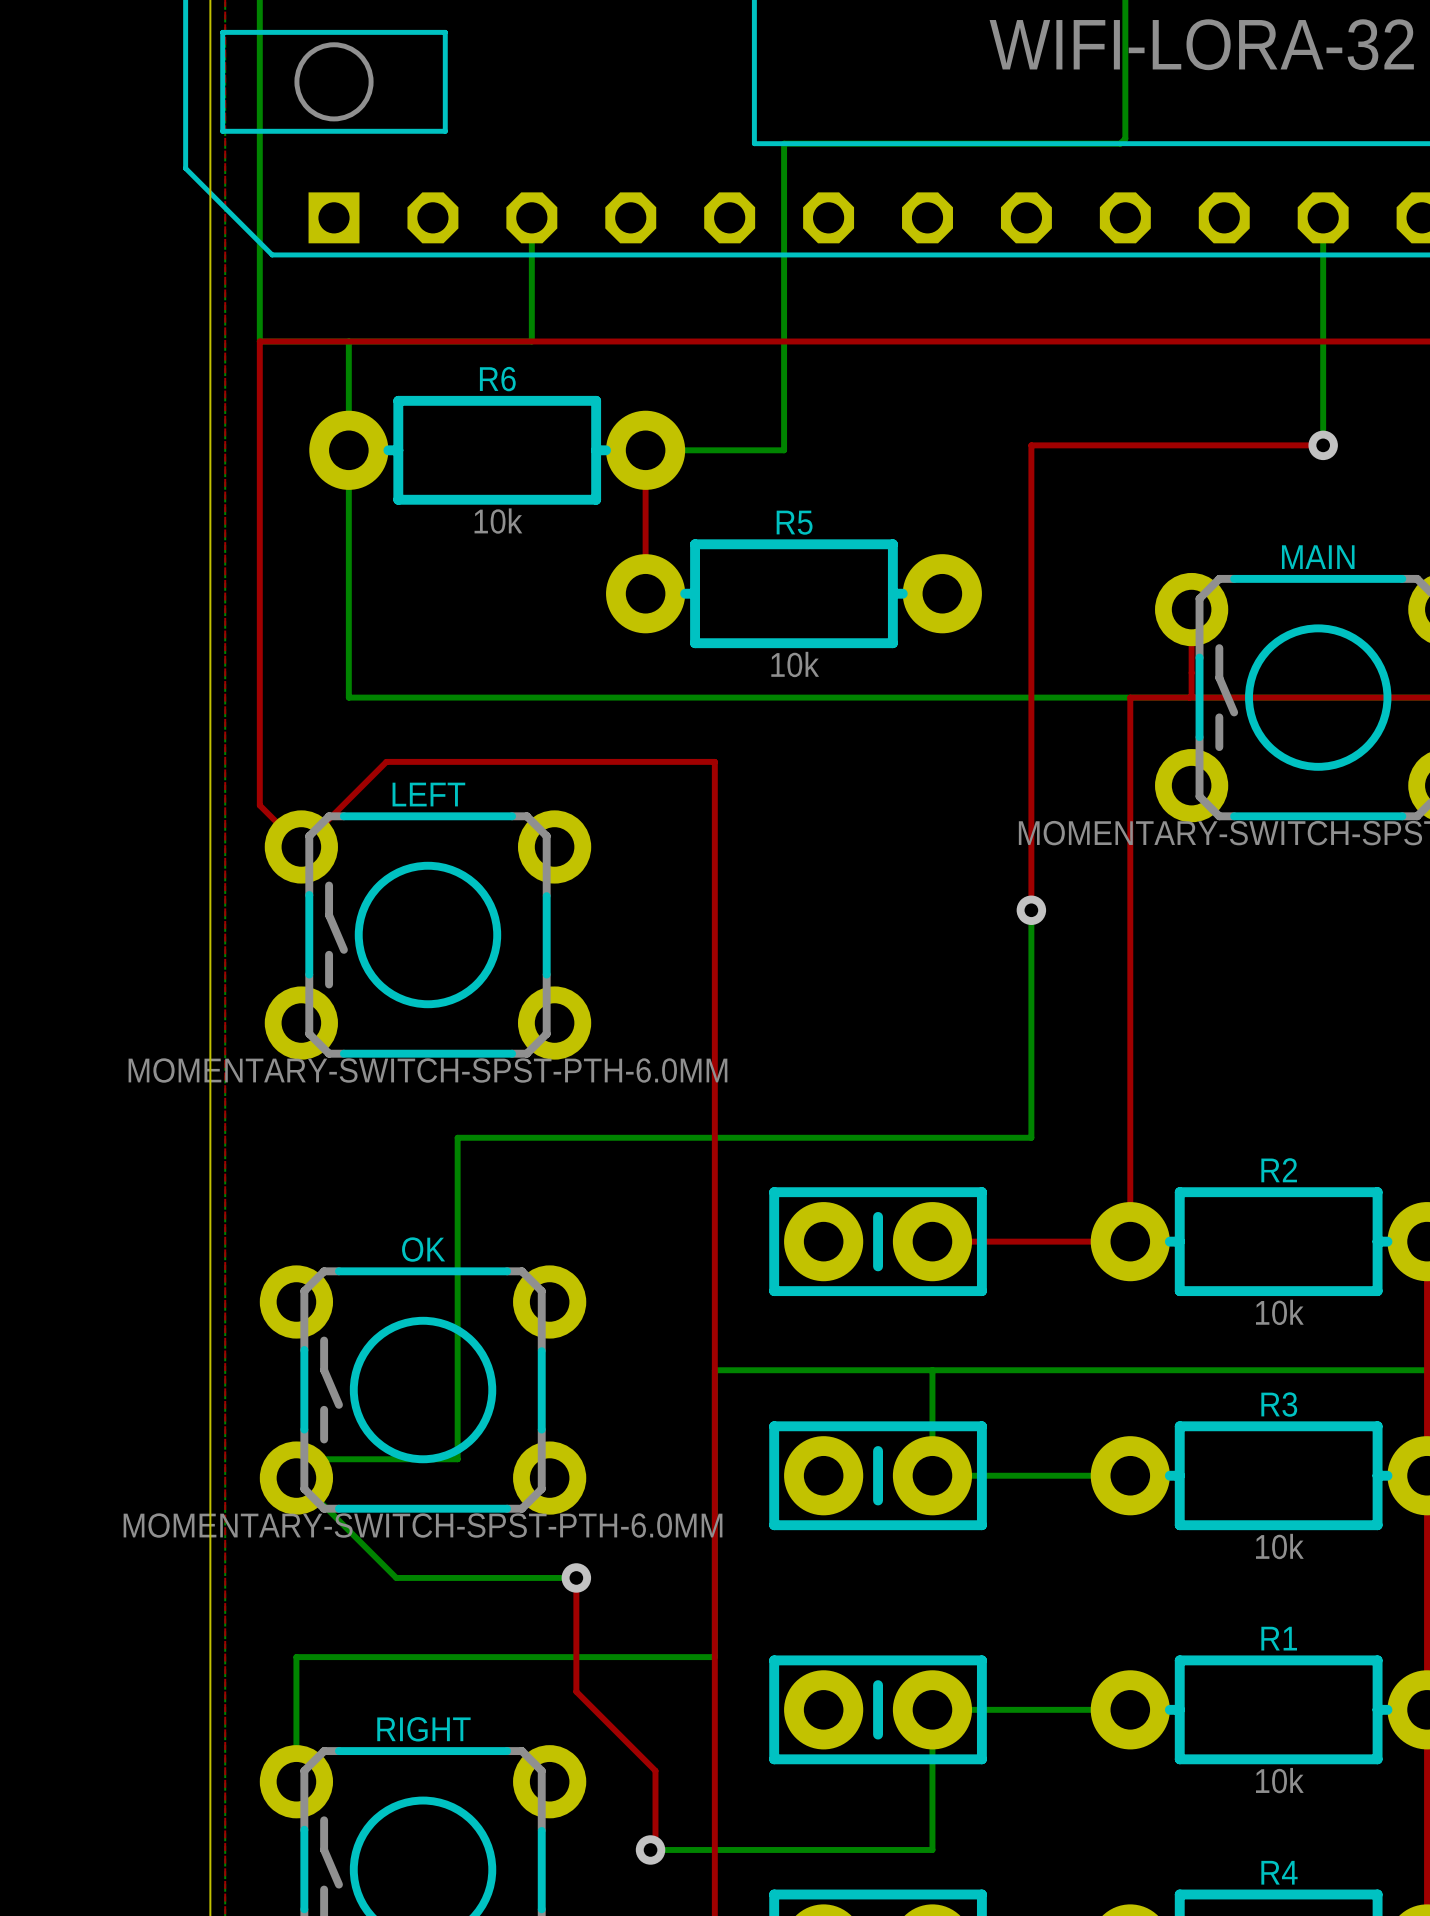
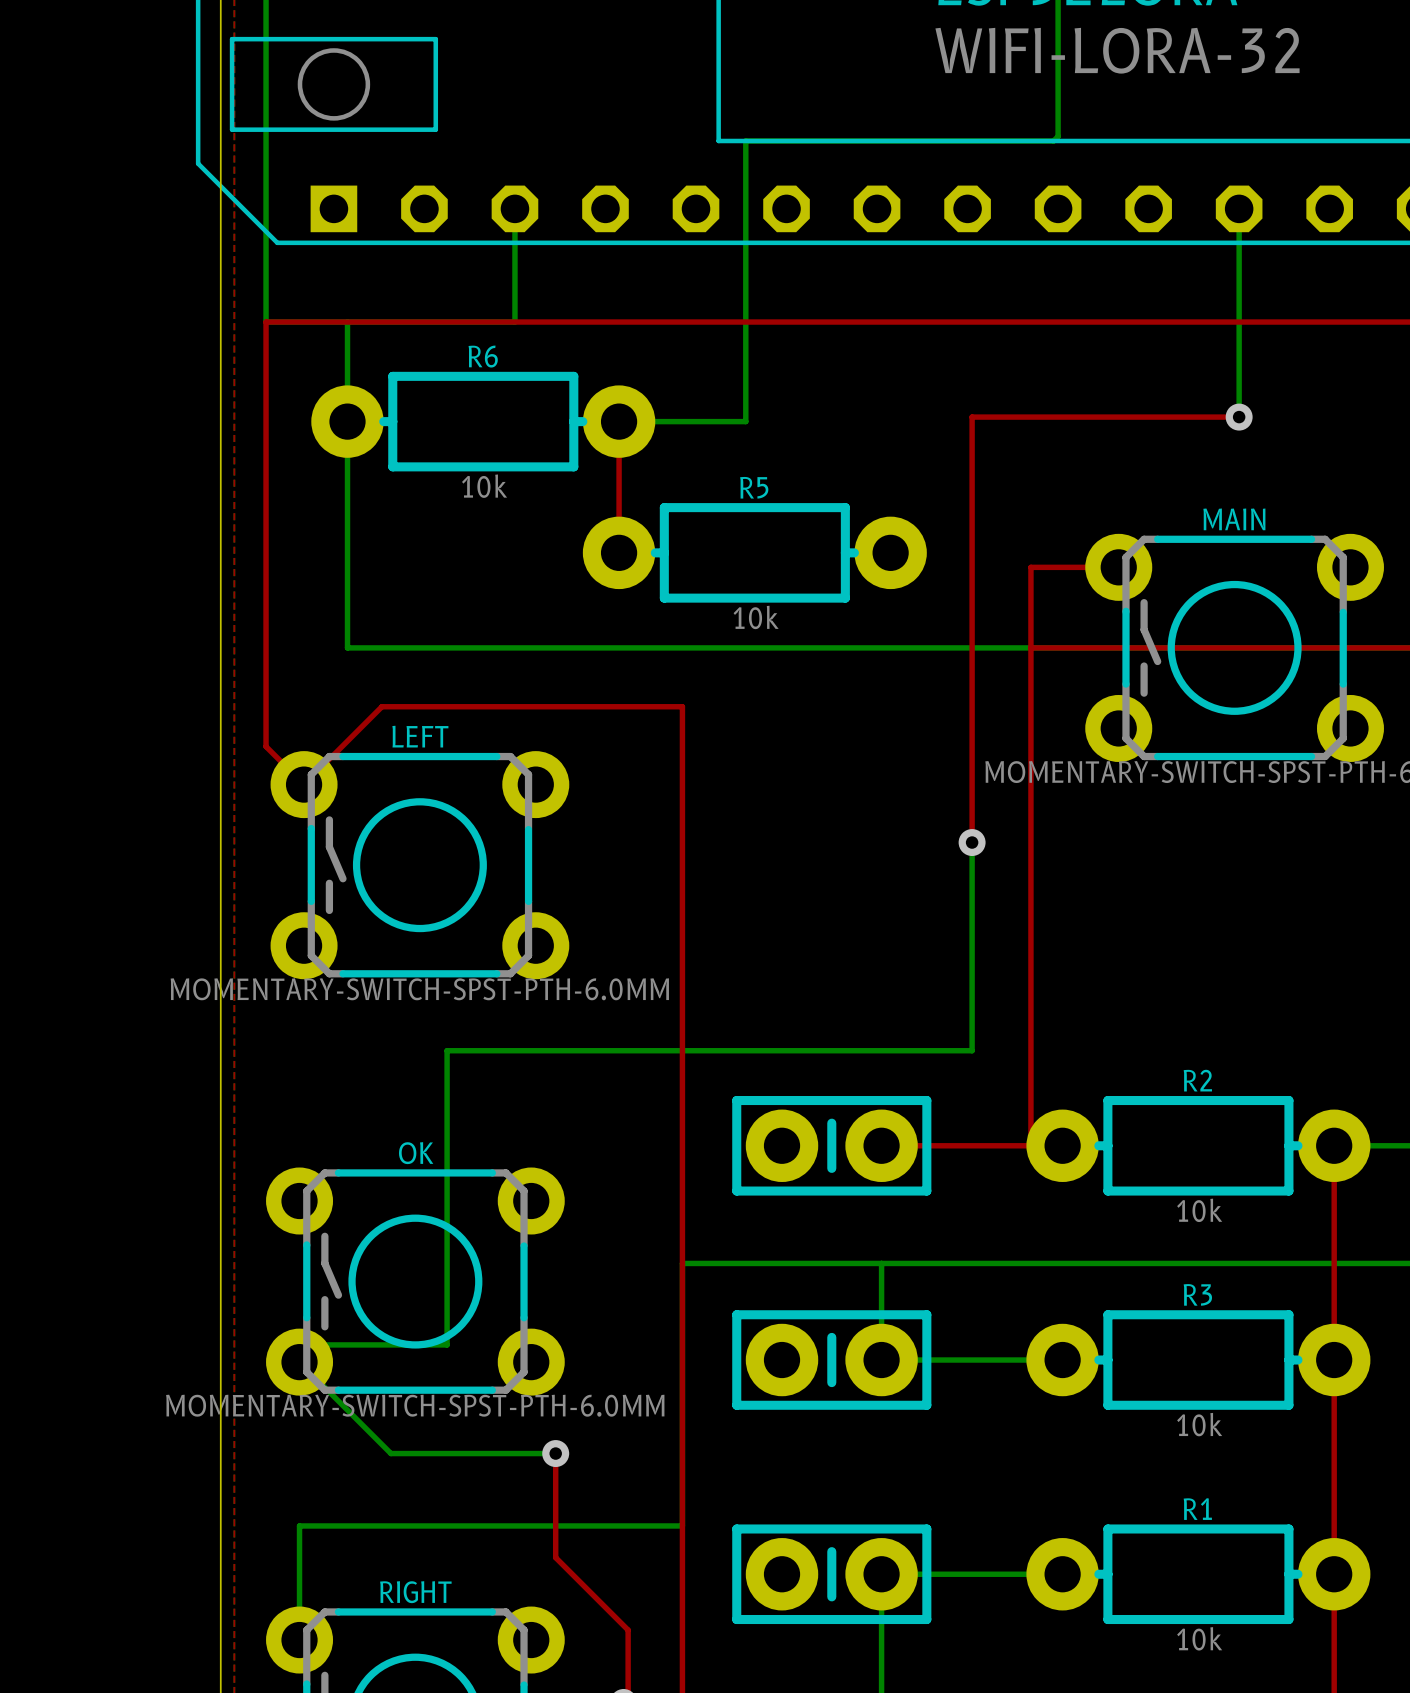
top track: (1191, 609) (1191, 695) (1189, 697) -> (1118, 567) (1030, 567) (1030, 1145)
top track: (1130, 697) (1130, 1241) -> (1062, 647) (1030, 647)

